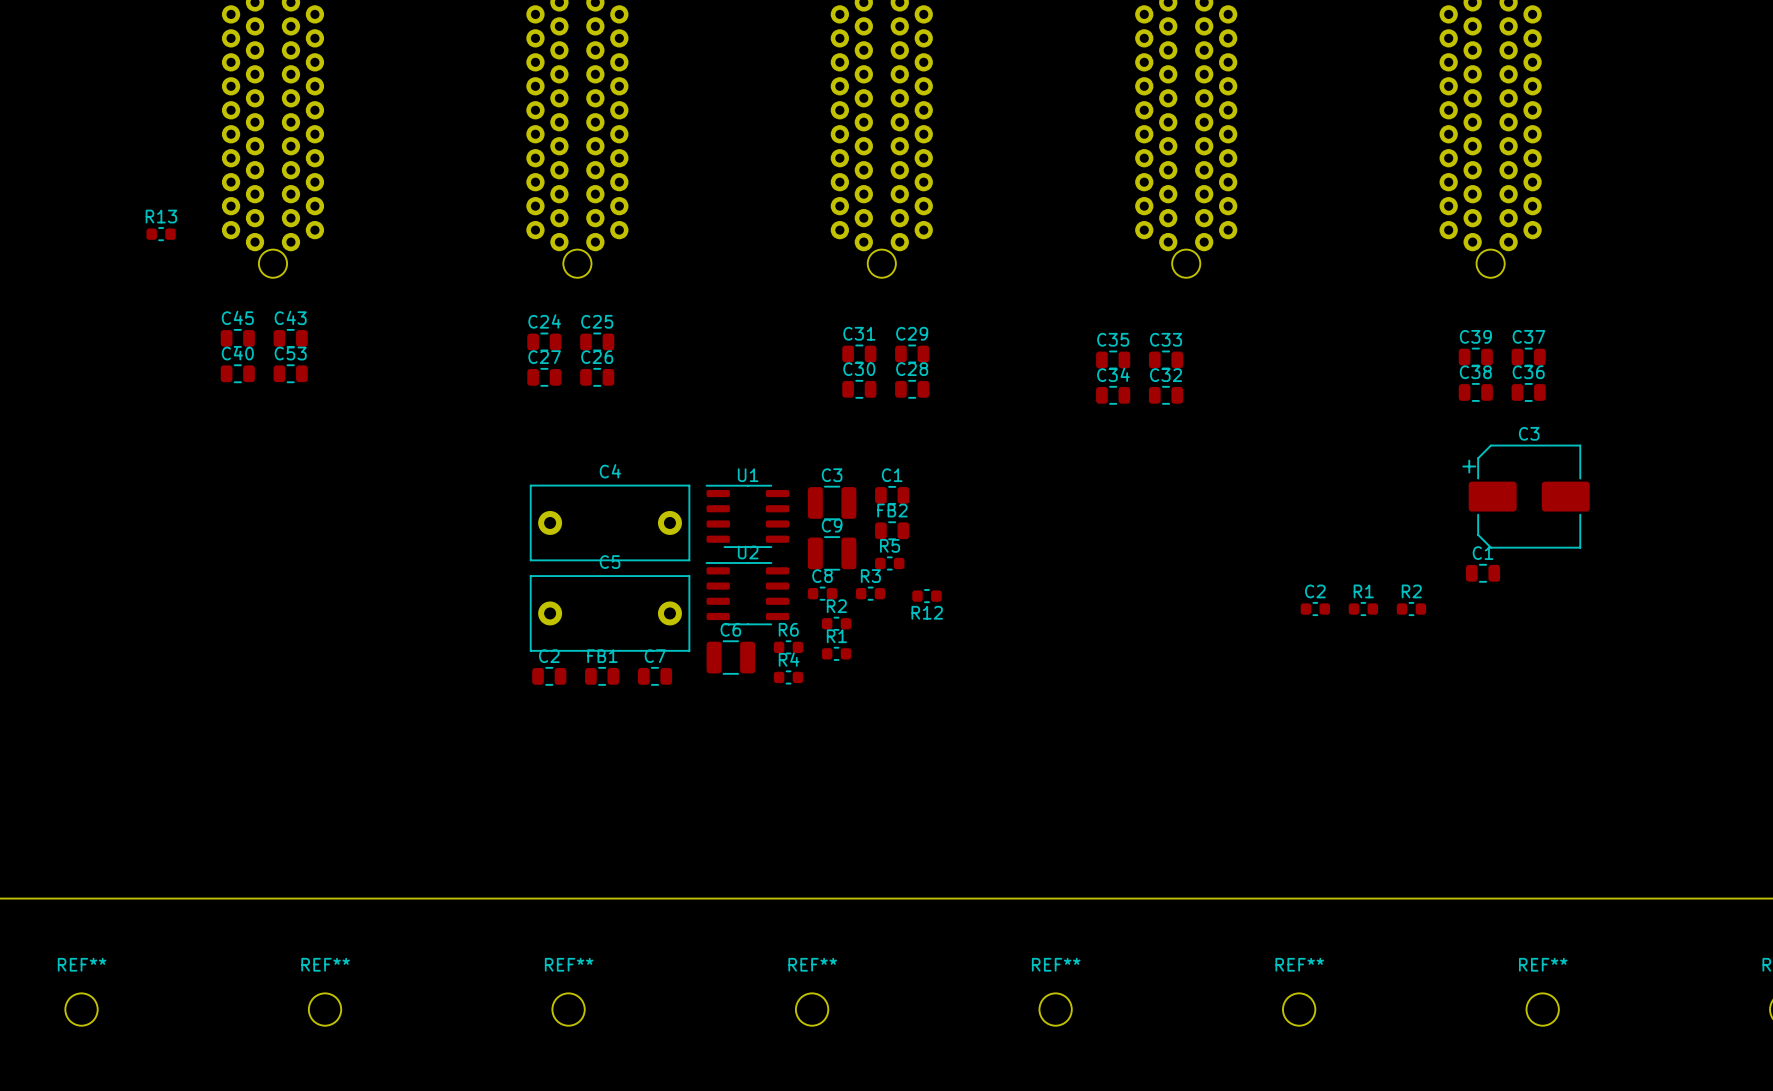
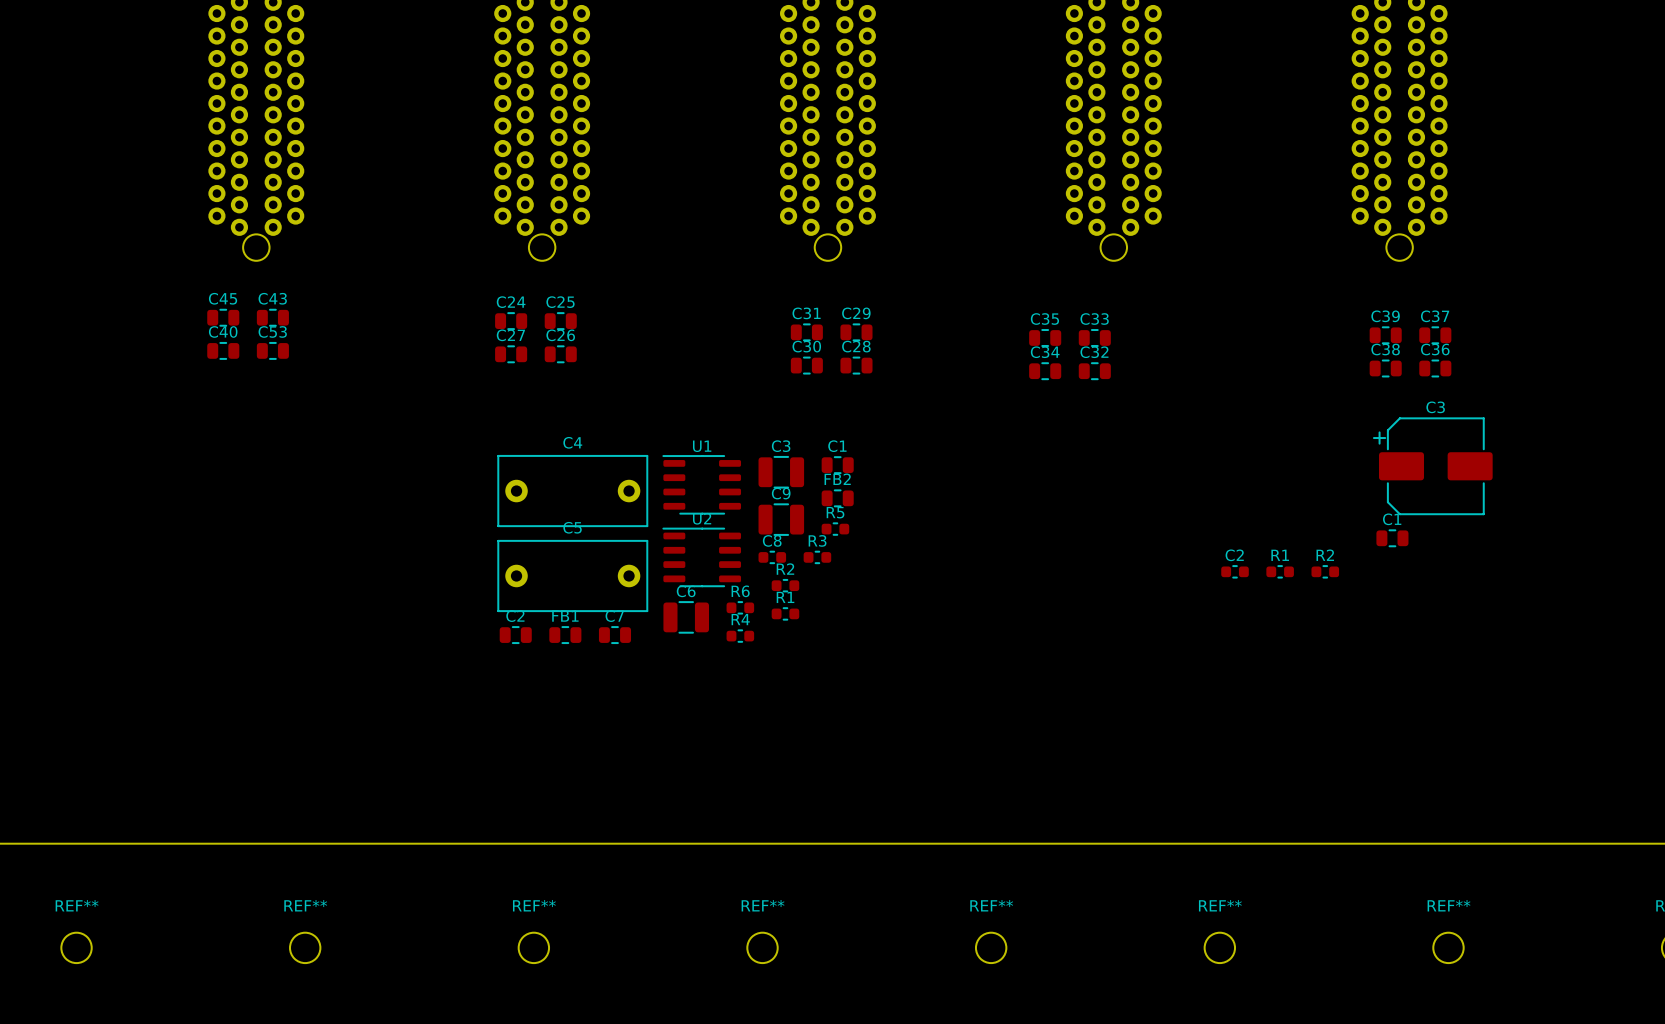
R13: (161, 234) -> none
R12: (926, 596) -> none

